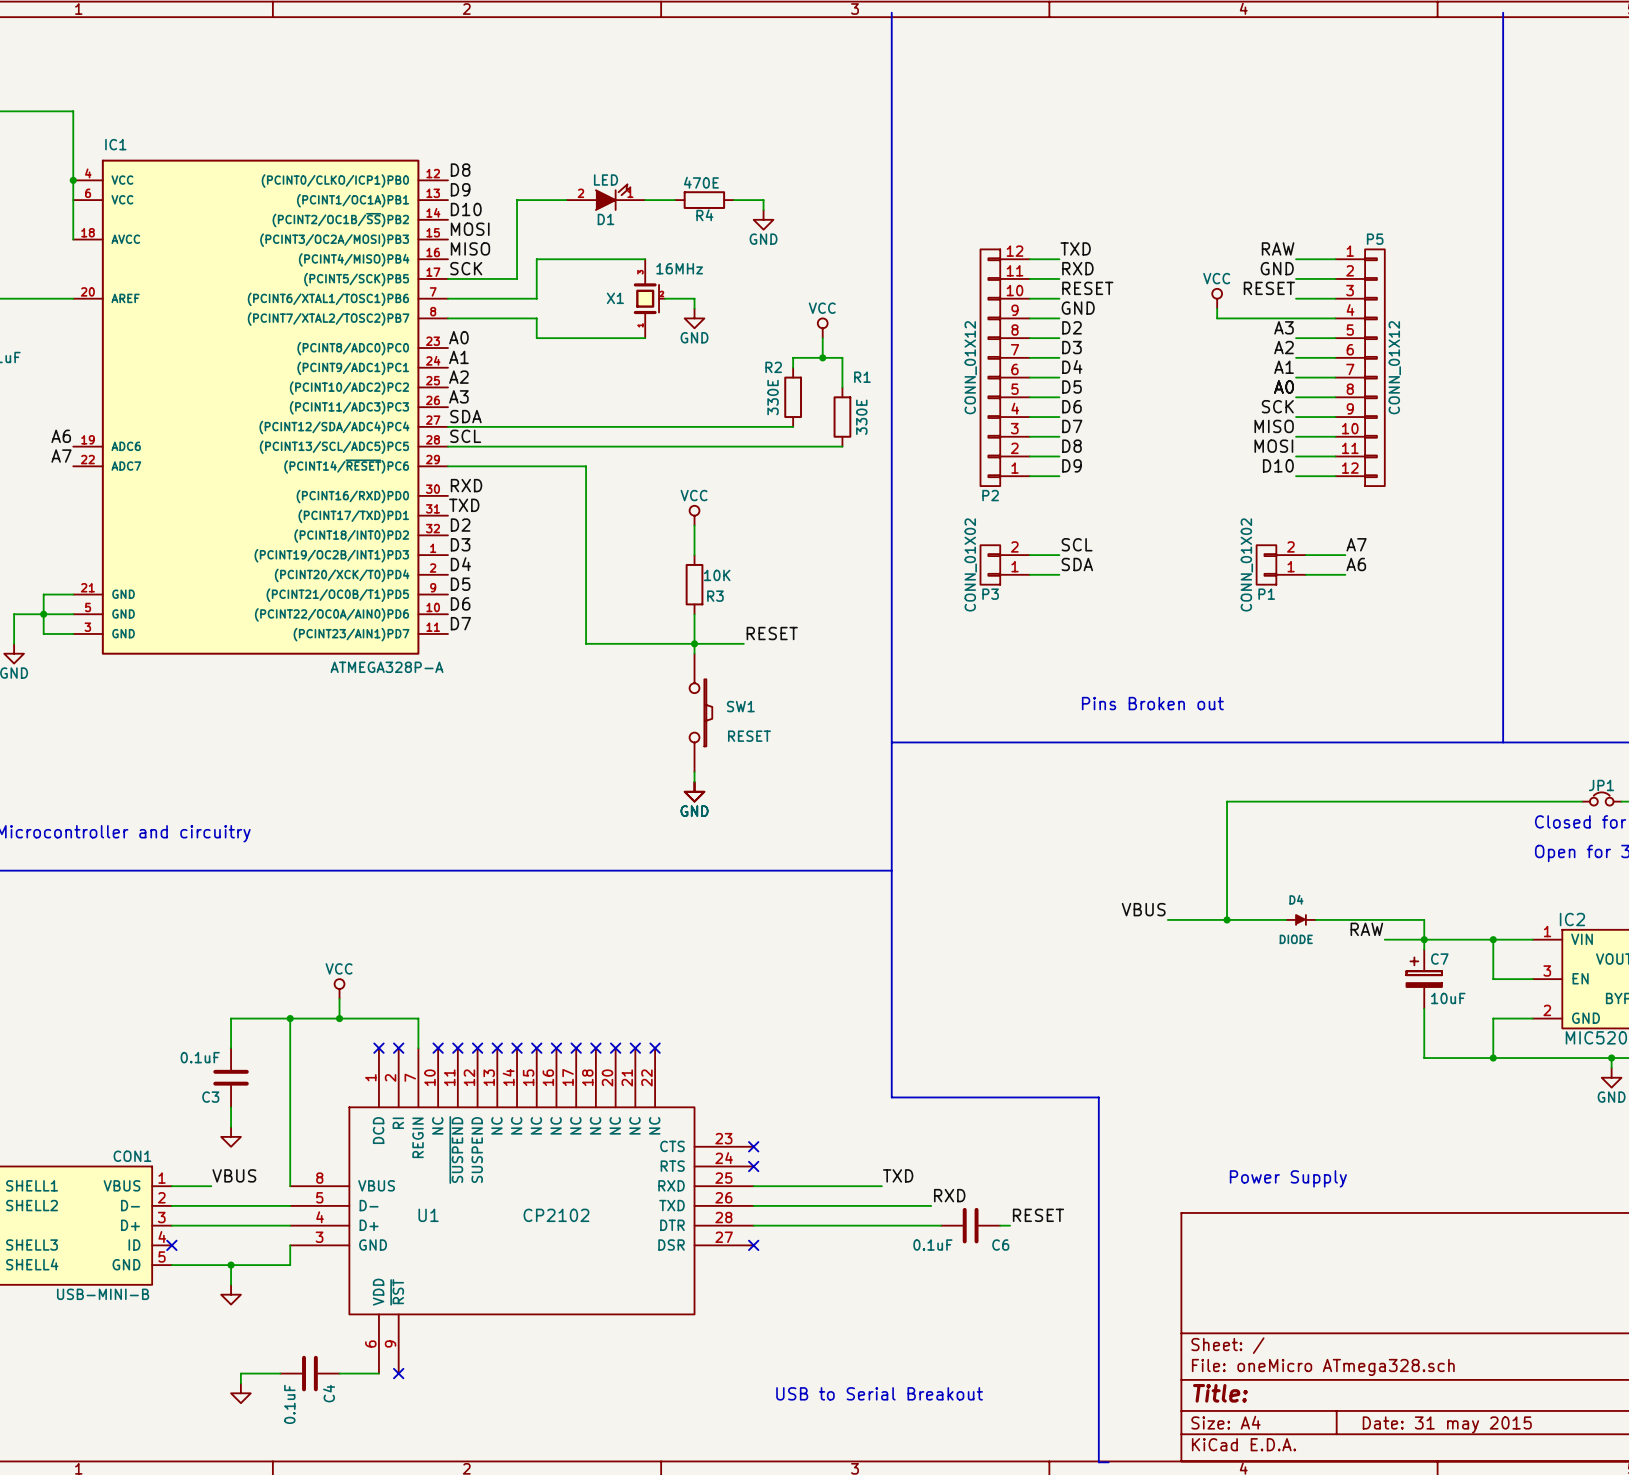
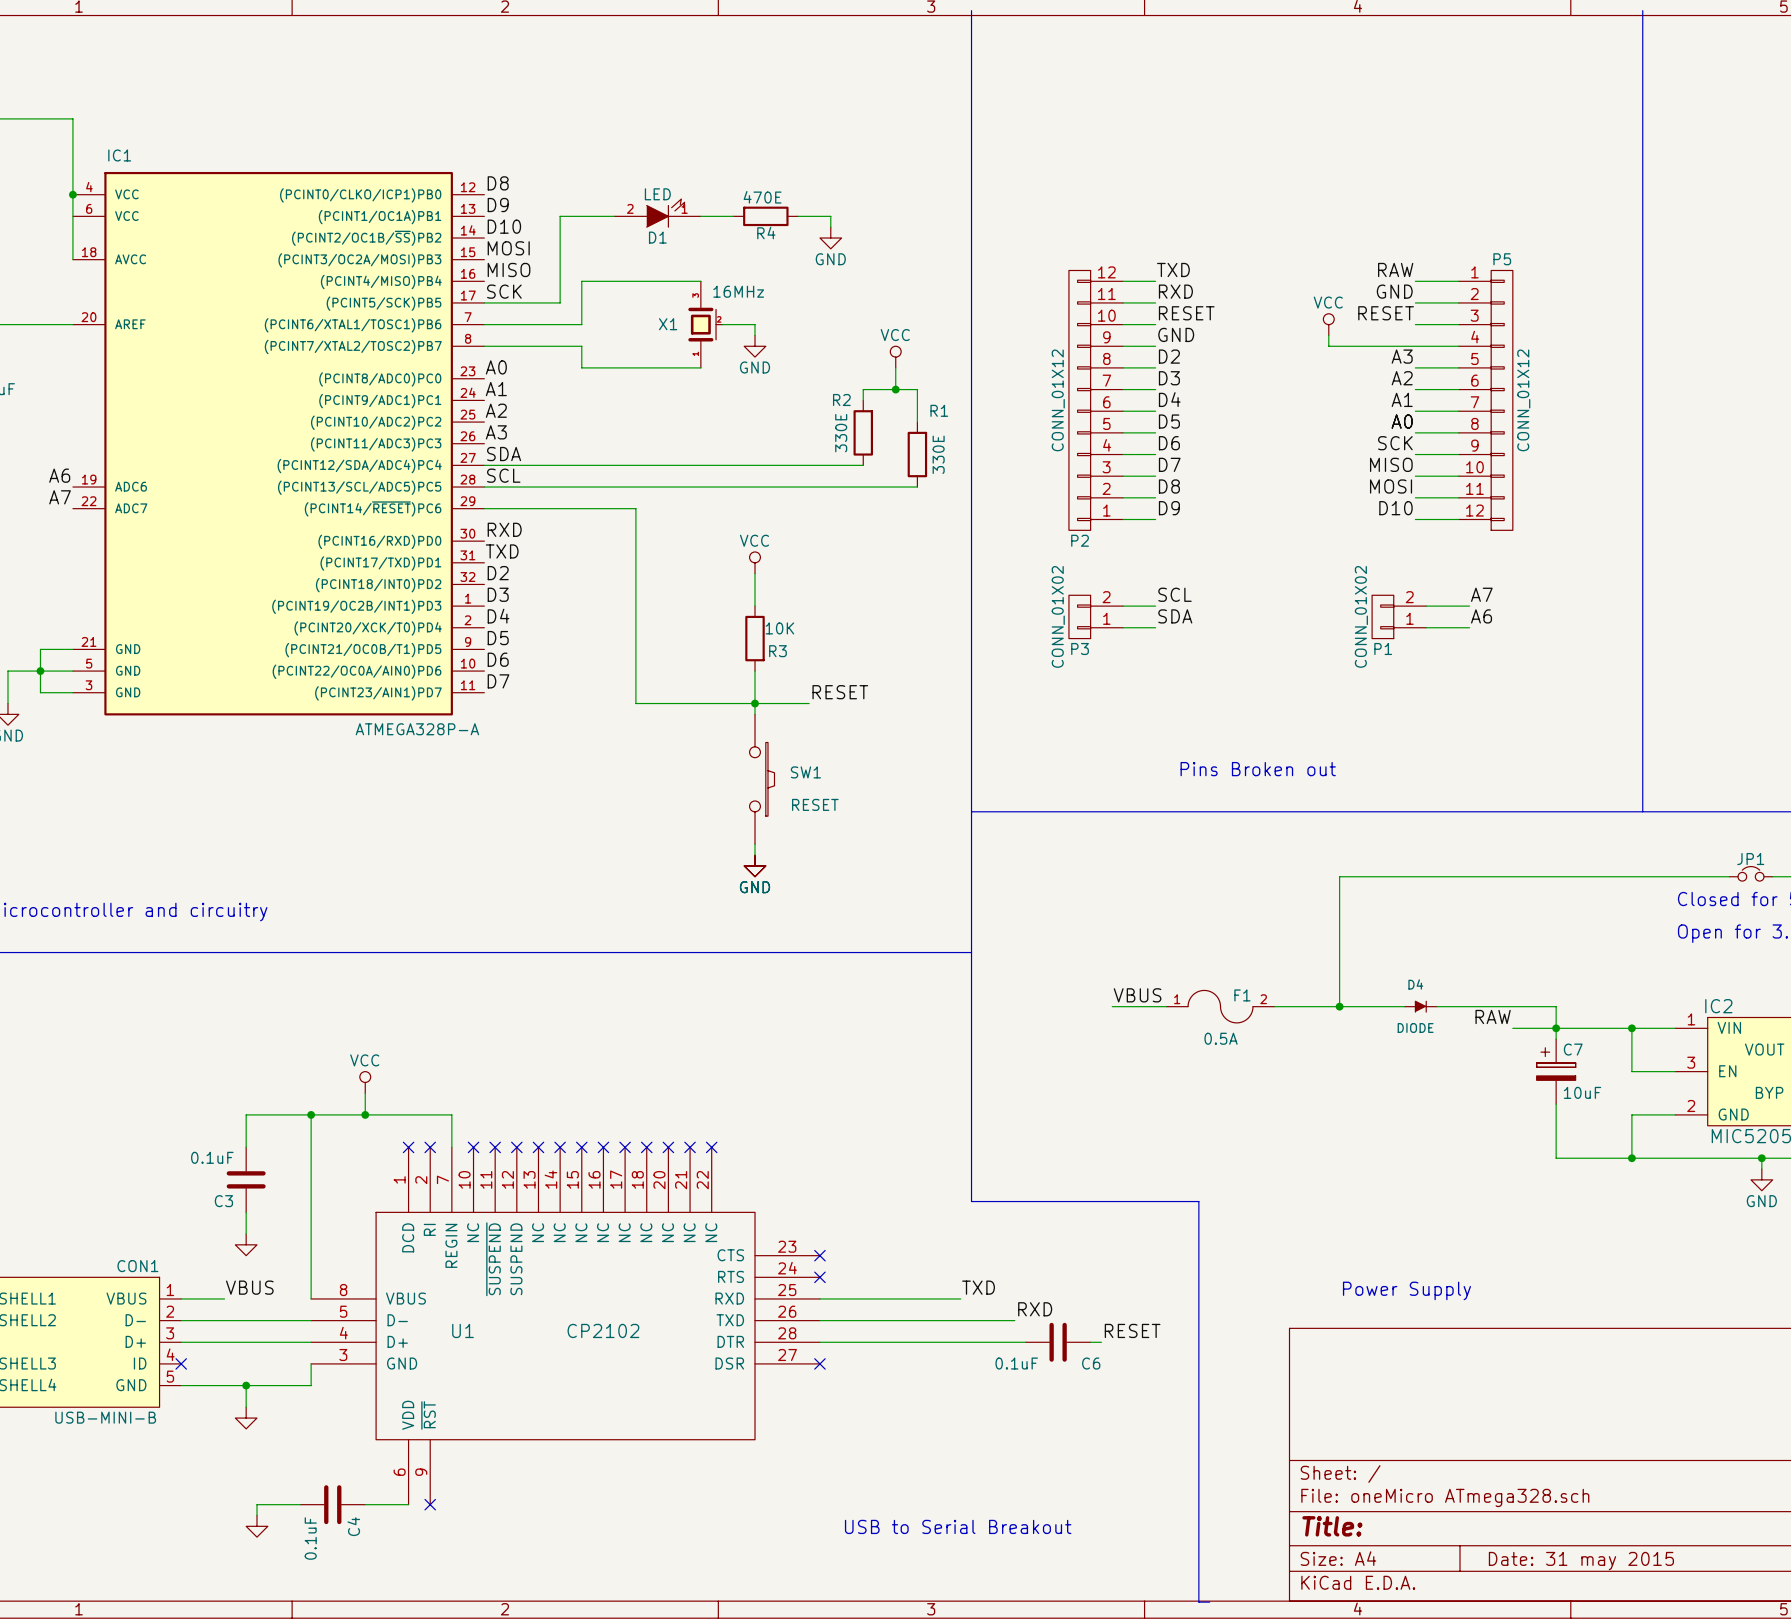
label position: VBUS (1143, 909) -> VBUS (1137, 995)
wire: none -> (1112, 1006) (1166, 1006)
F1: none -> 0.5A (1220, 1006)

